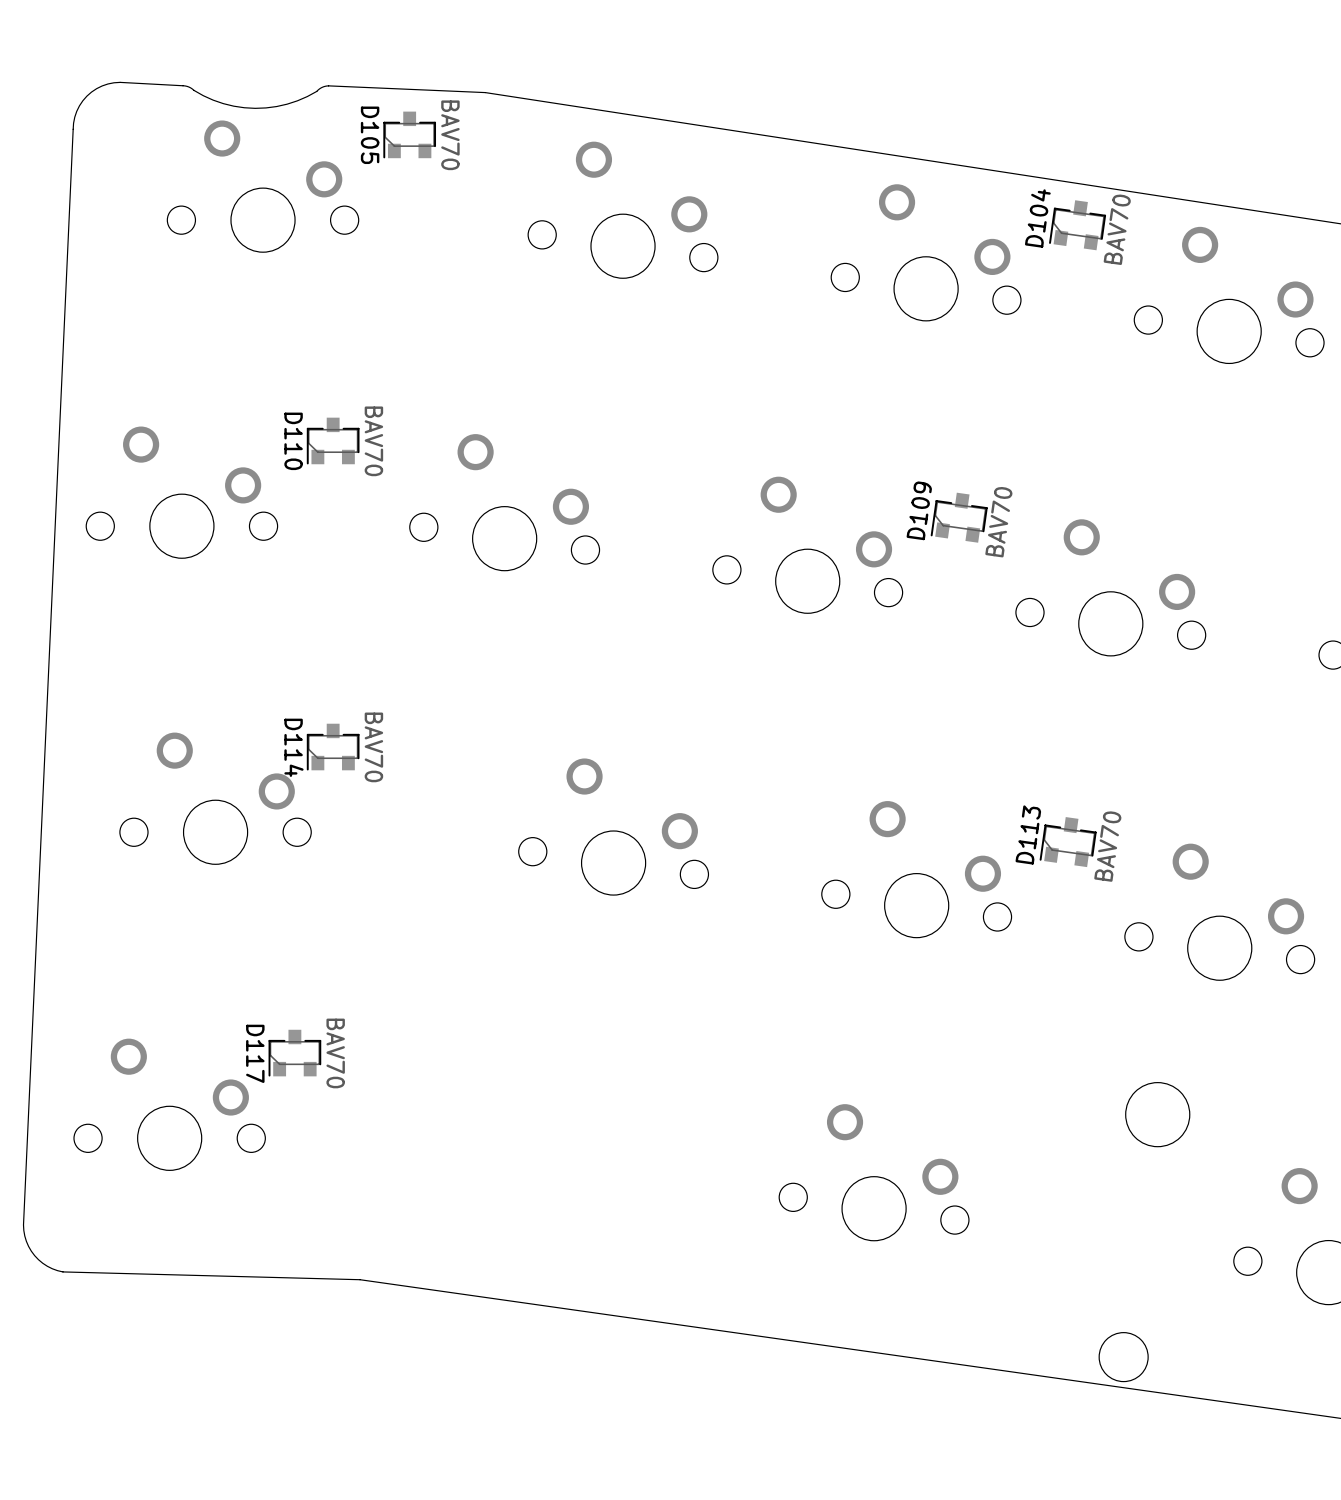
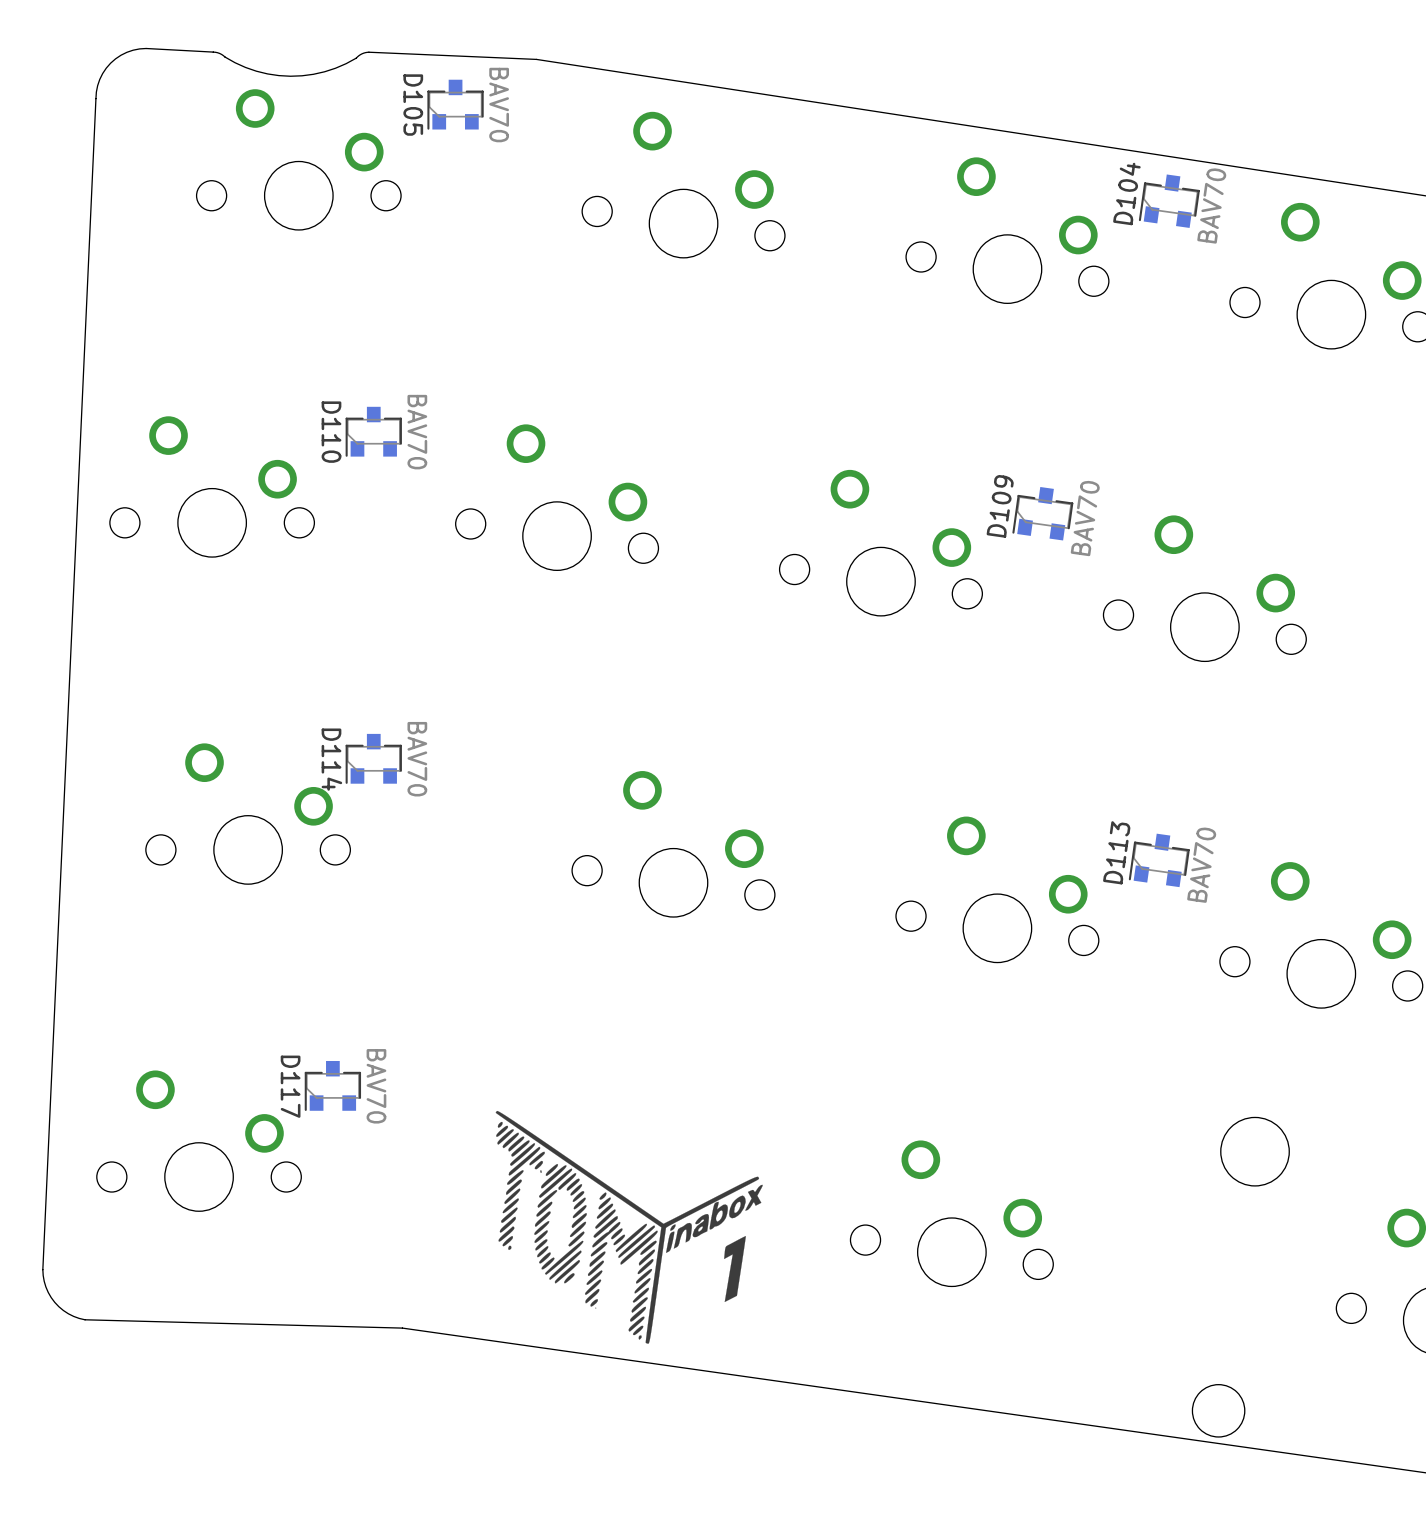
drawing: none -> [495, 1110, 763, 1344]

